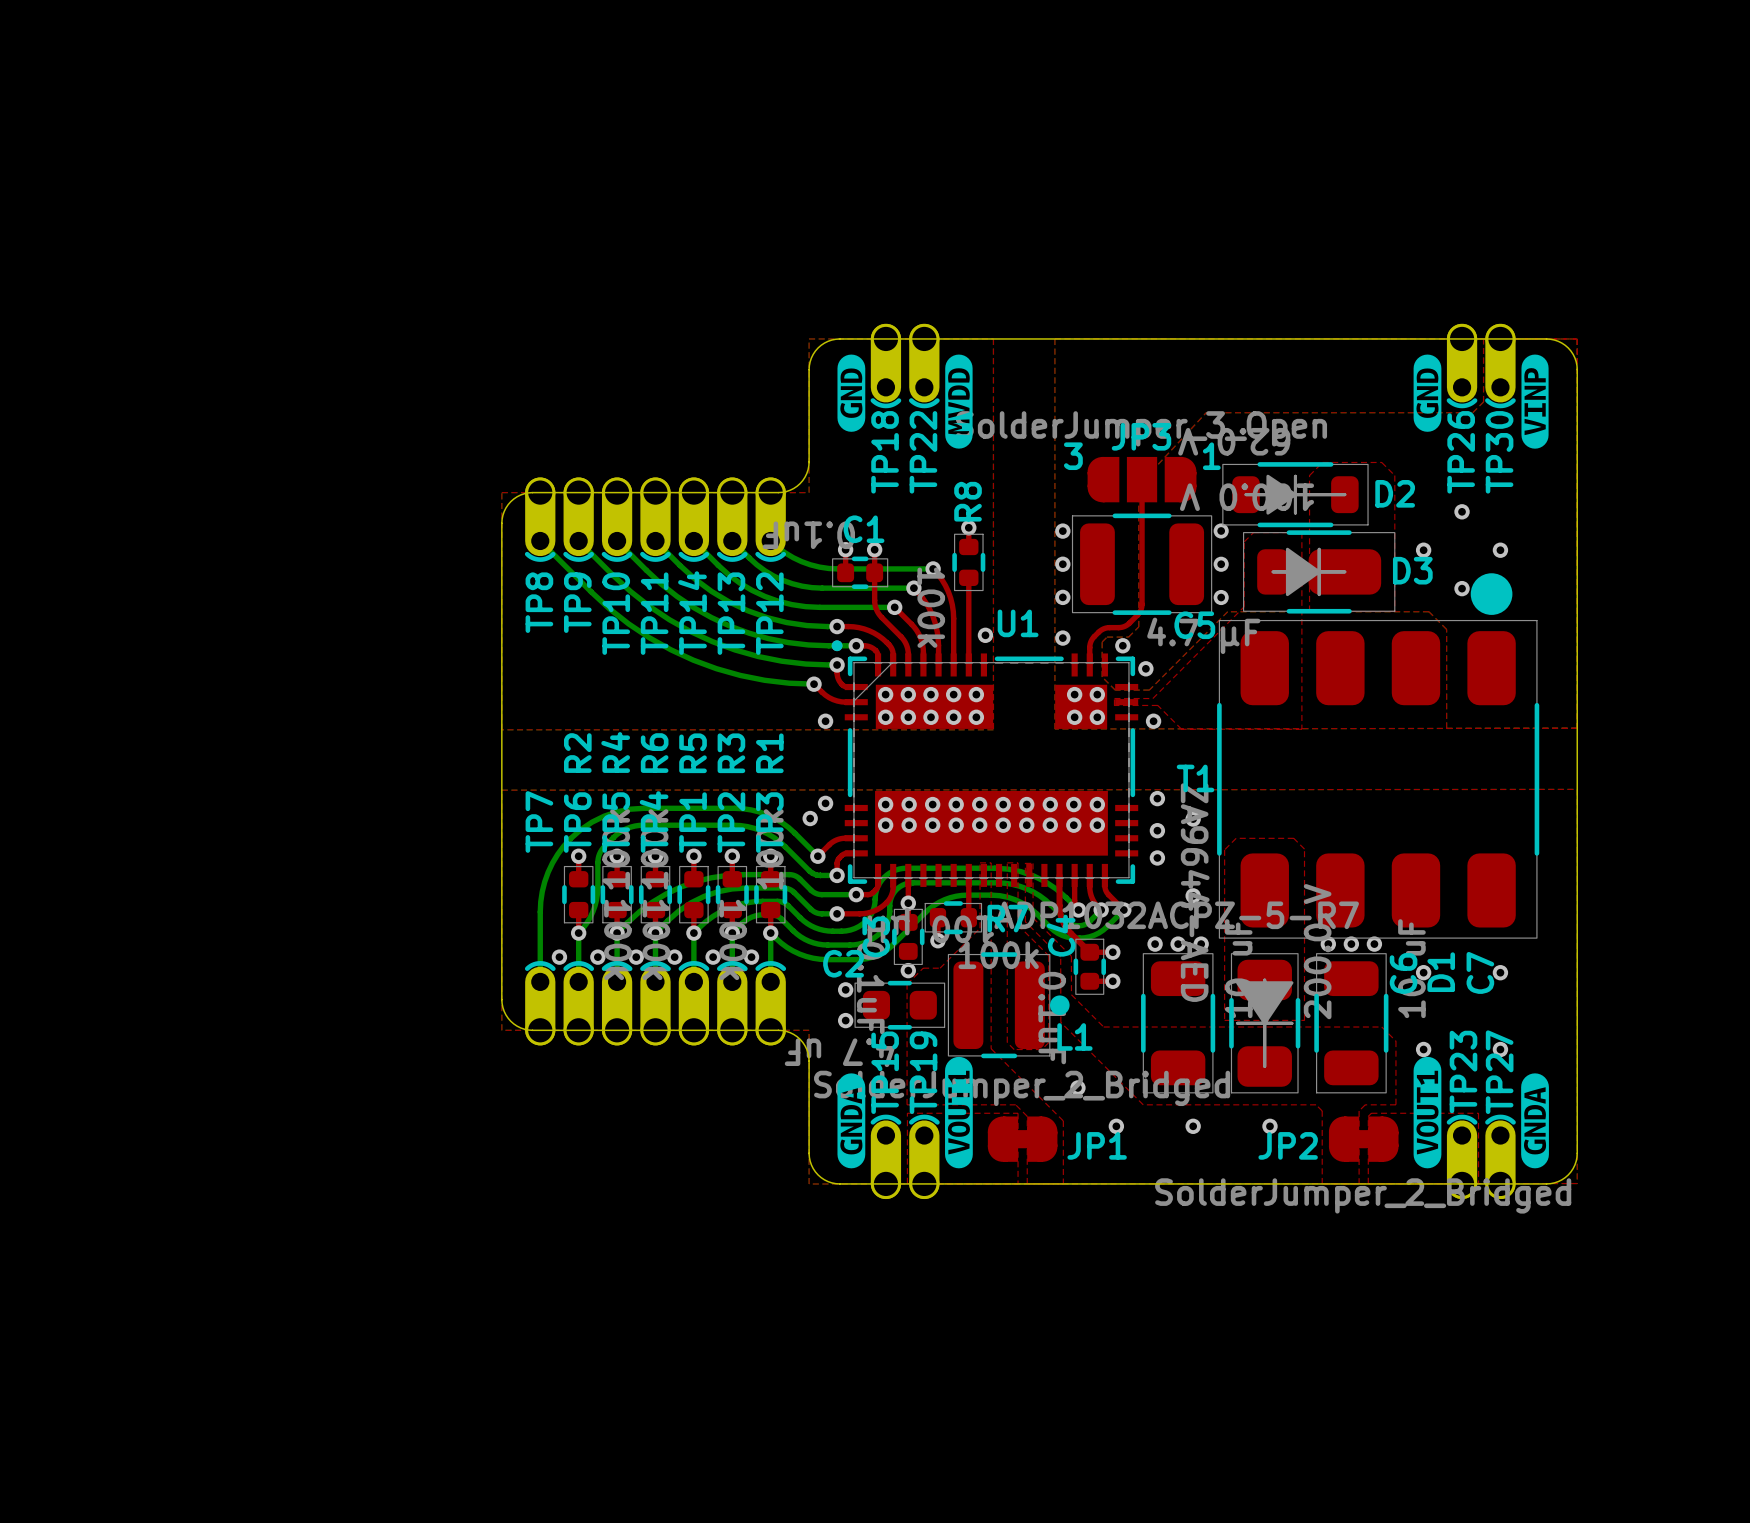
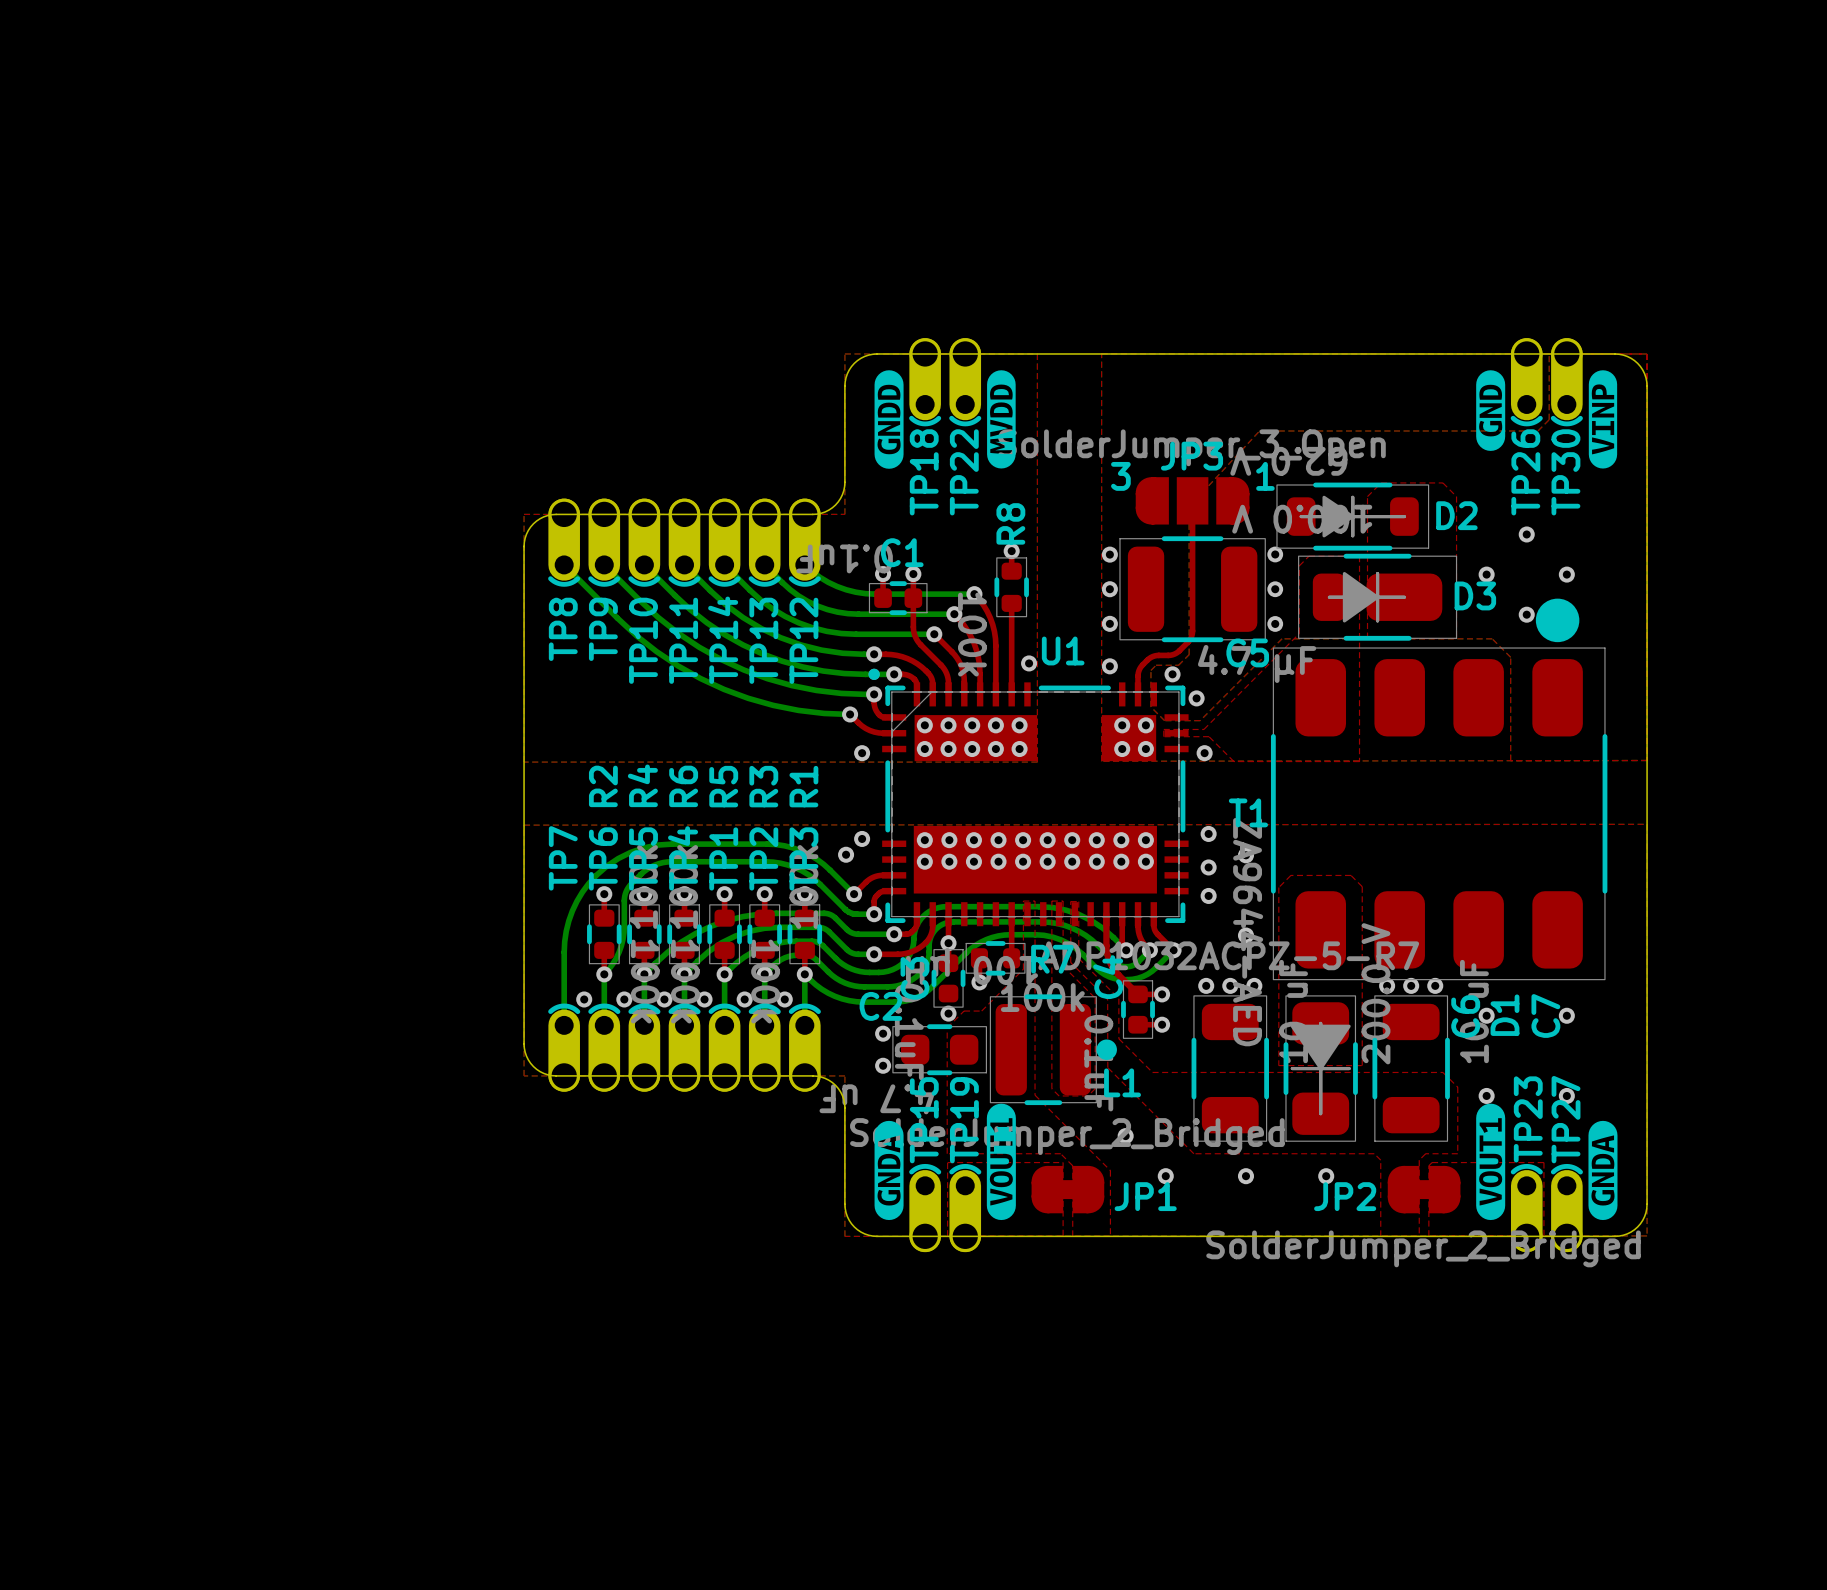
drawing shape: [837, 354, 866, 432] -> [874, 370, 904, 469]

